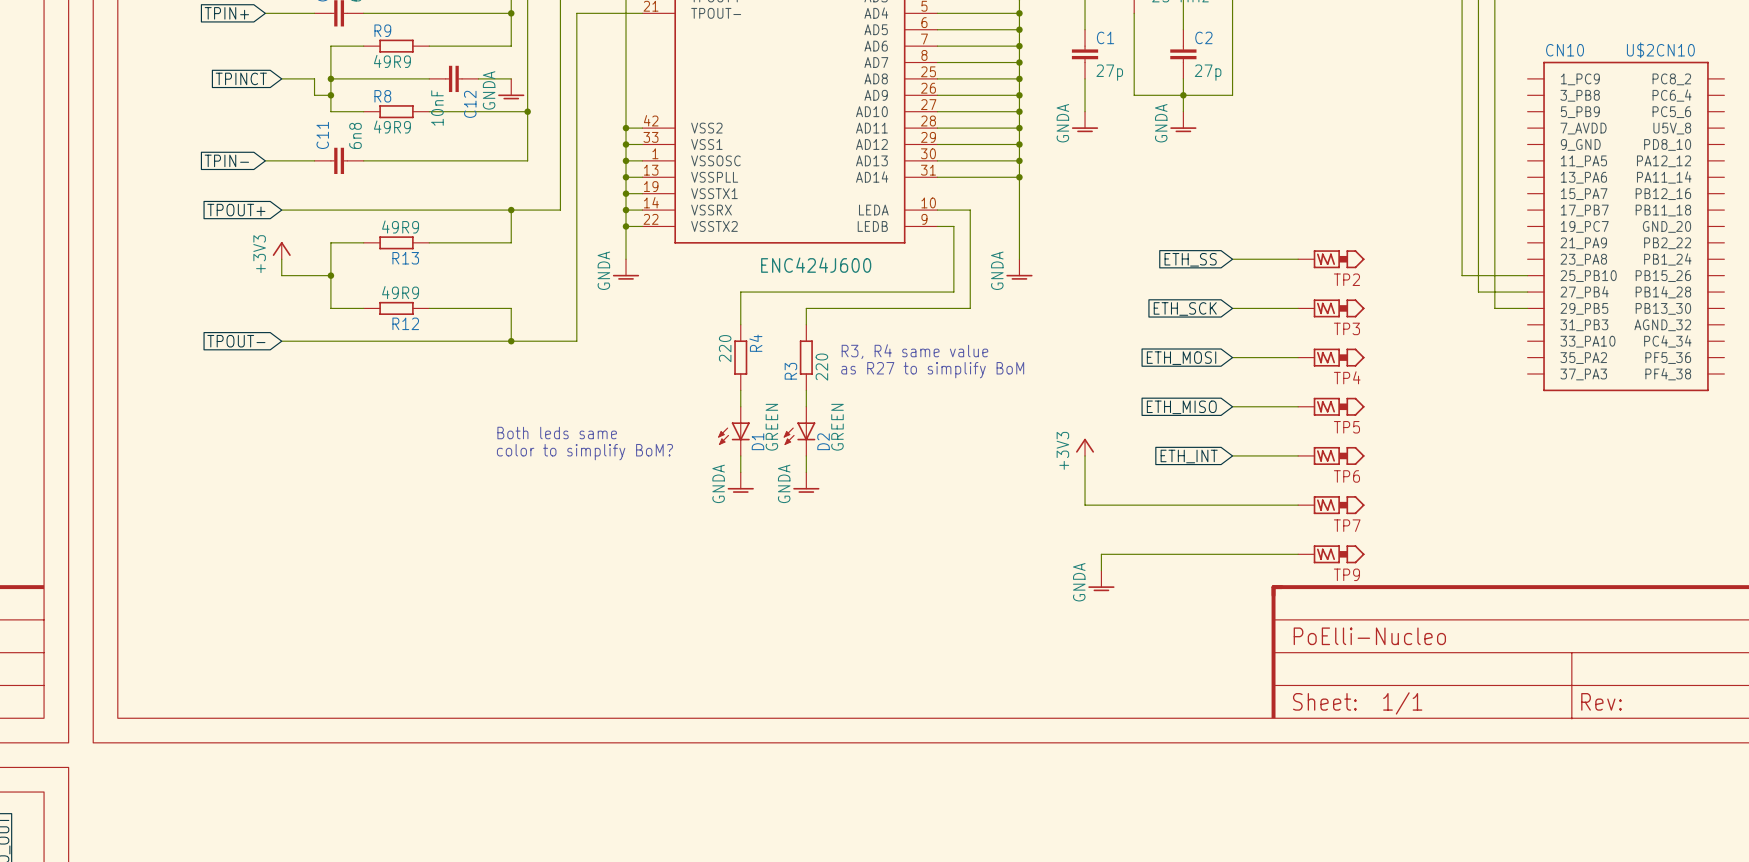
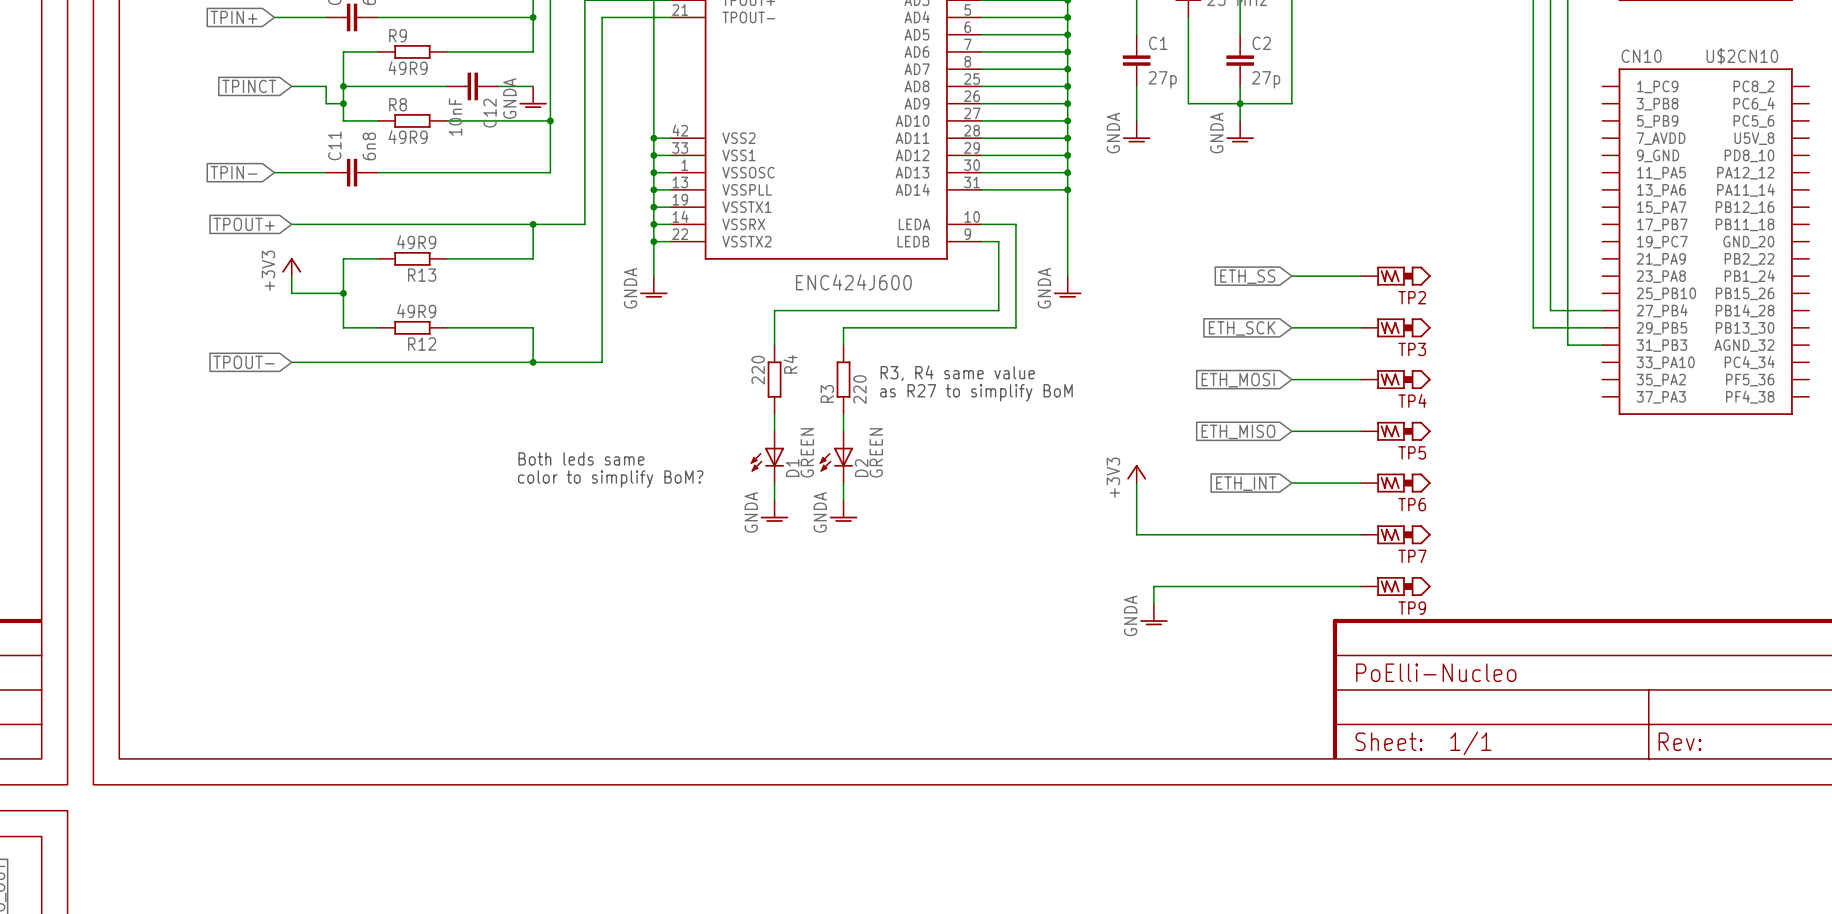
wire: (1462, 275) (1527, 275) -> (1533, 293) (1533, 327) (1567, 327) (1567, 345) (1602, 345)

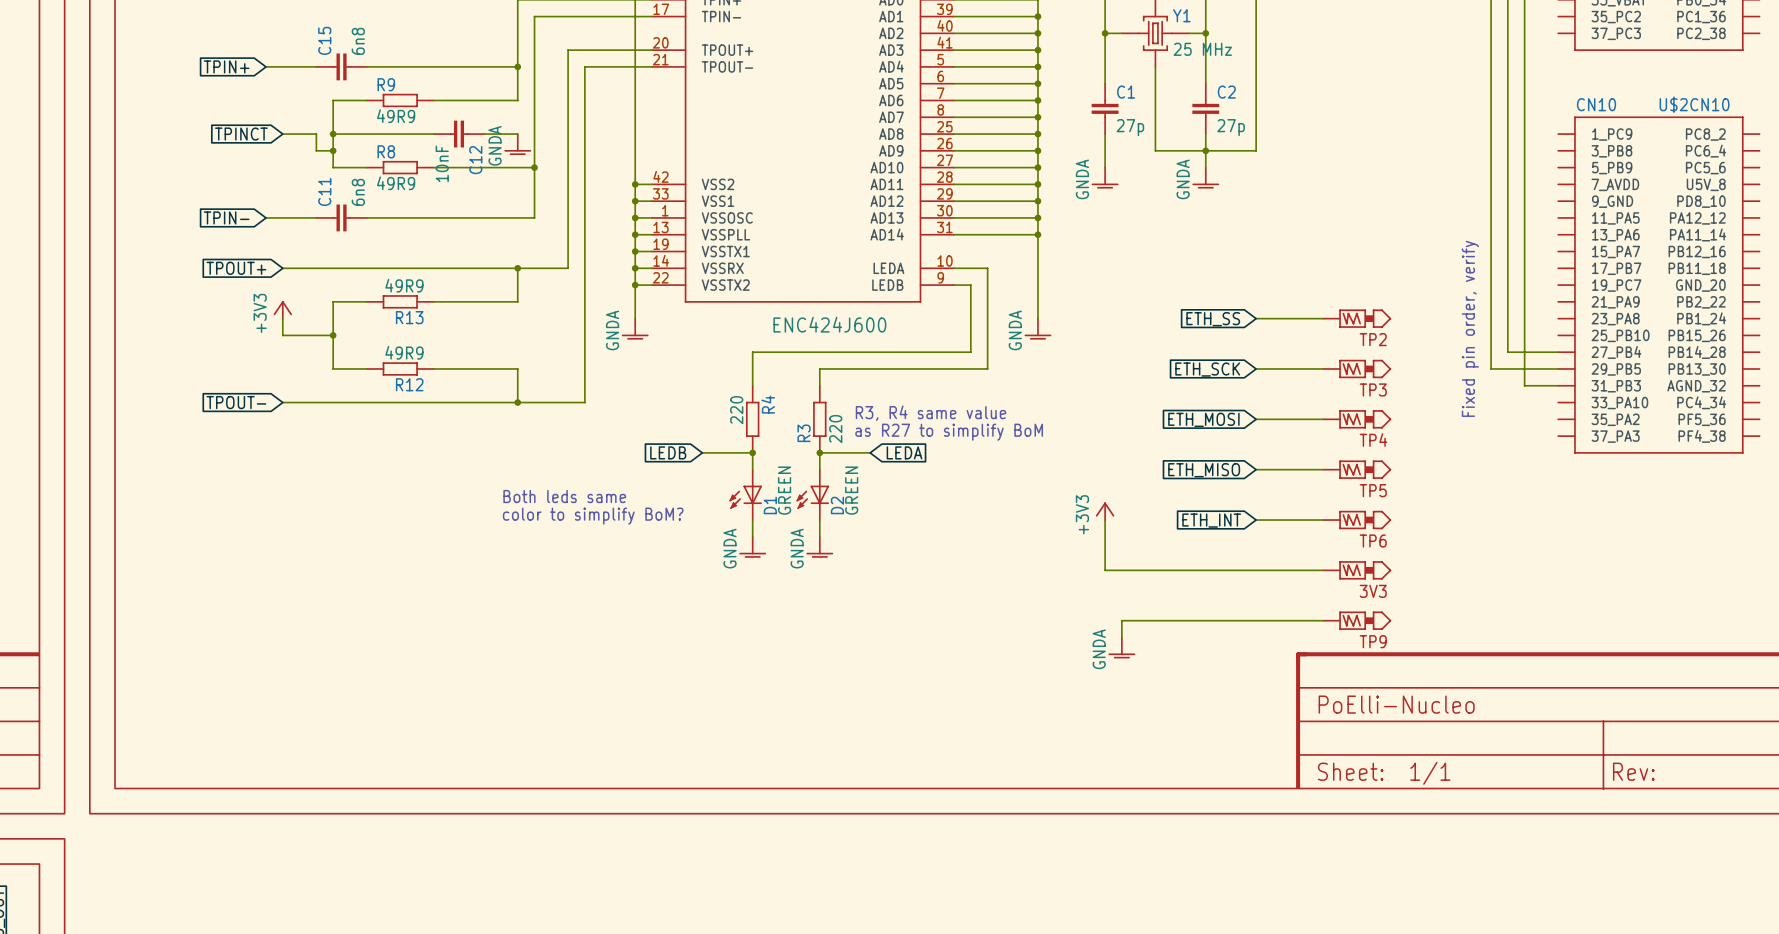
text: none -> Fixed pin order, verify (1470, 328)
global label: none -> LEDB (668, 452)
wire: none -> (702, 452) (752, 452)
junction: none -> (752, 452)
wire: none -> (819, 452) (870, 452)
junction: none -> (819, 452)
global label: none -> LEDA (904, 452)
TP7 name: TP7 (1412, 556) -> 3V3 (1373, 591)

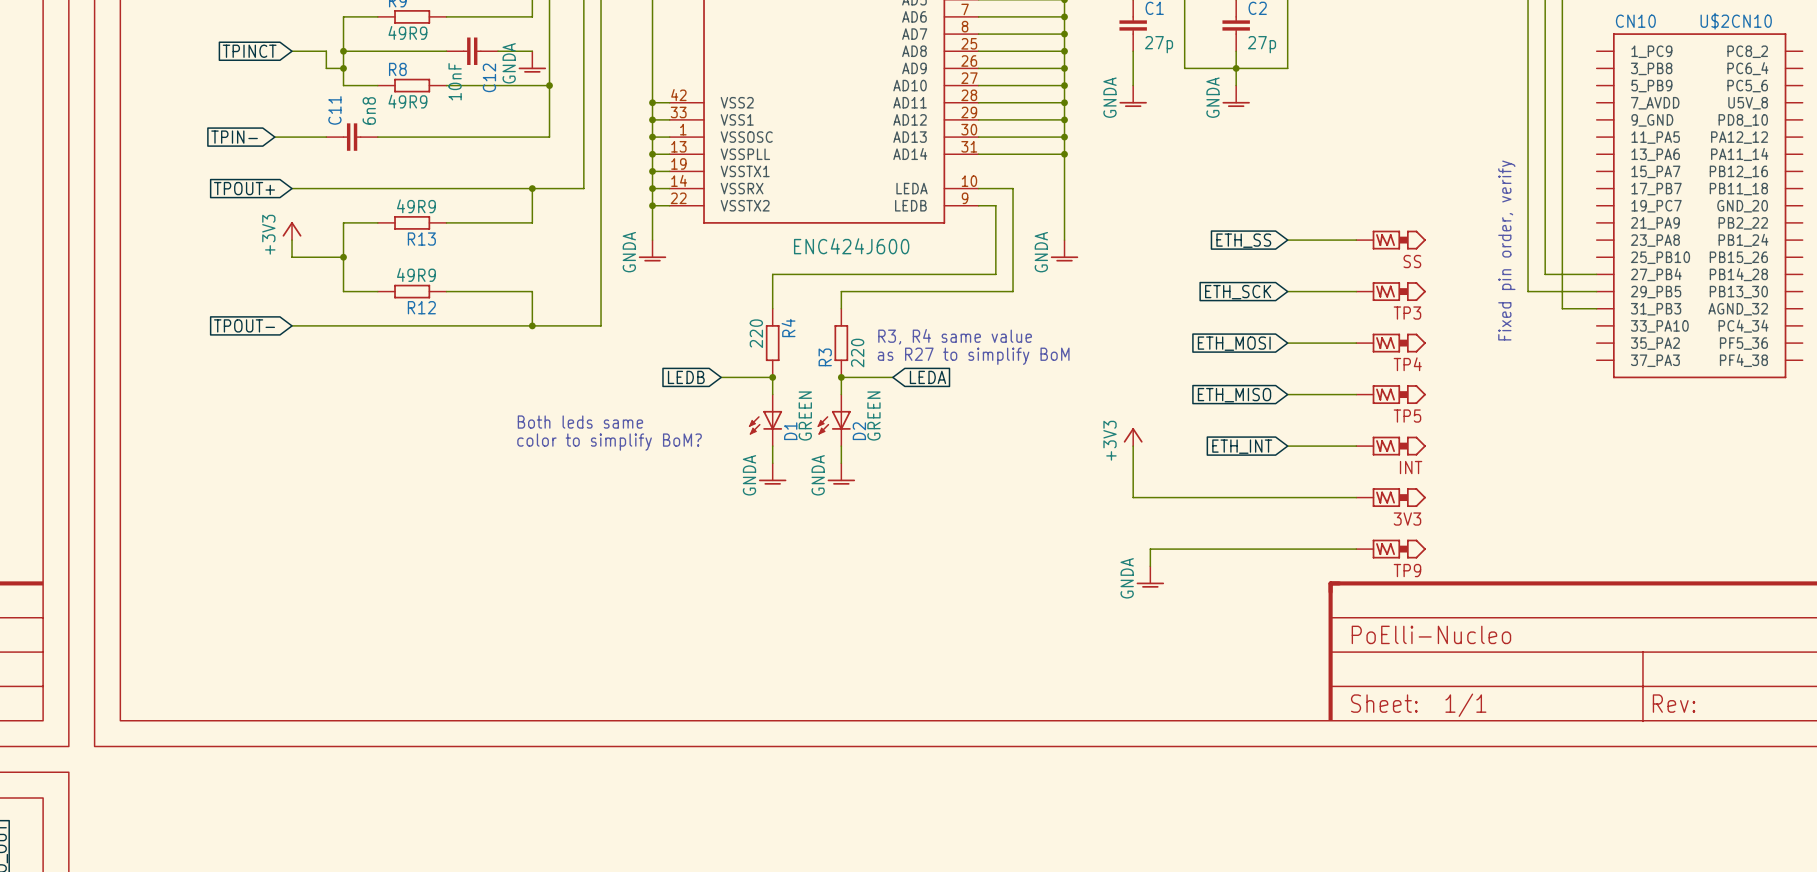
TP2 name: TP2 (1373, 339) -> SS (1412, 261)
TP6 name: TP6 (1373, 540) -> INT (1411, 467)

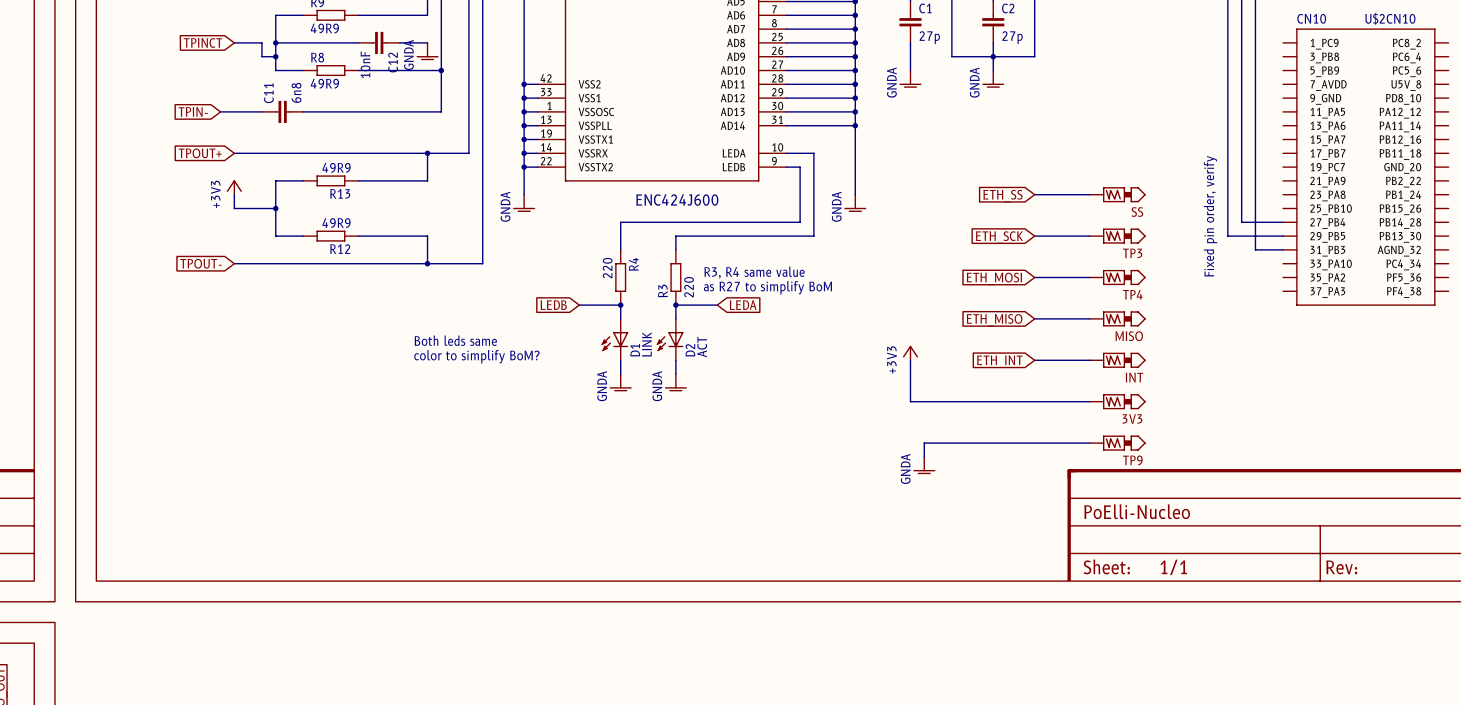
D1 value: GREEN (805, 416) -> LINK (646, 344)
D2 value: GREEN (873, 416) -> ACT (702, 347)
TP5 name: TP5 (1407, 416) -> MISO (1129, 336)

